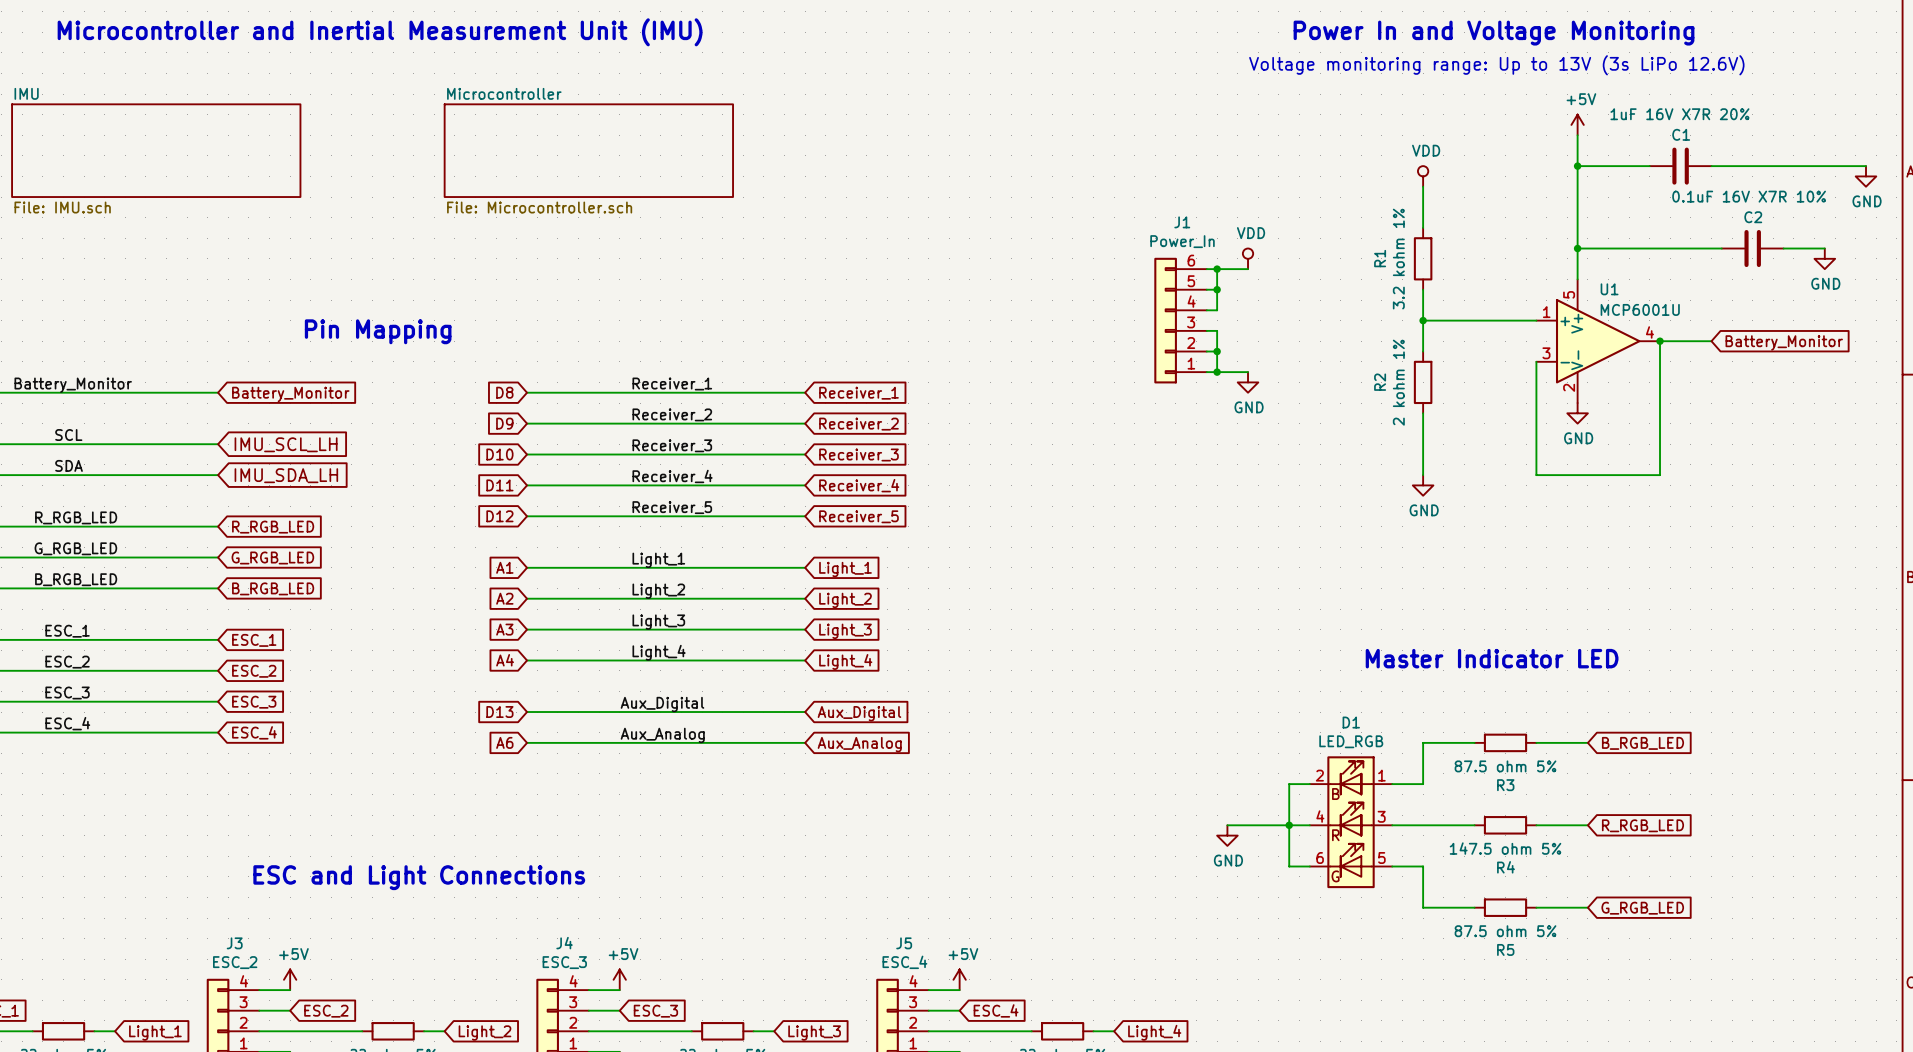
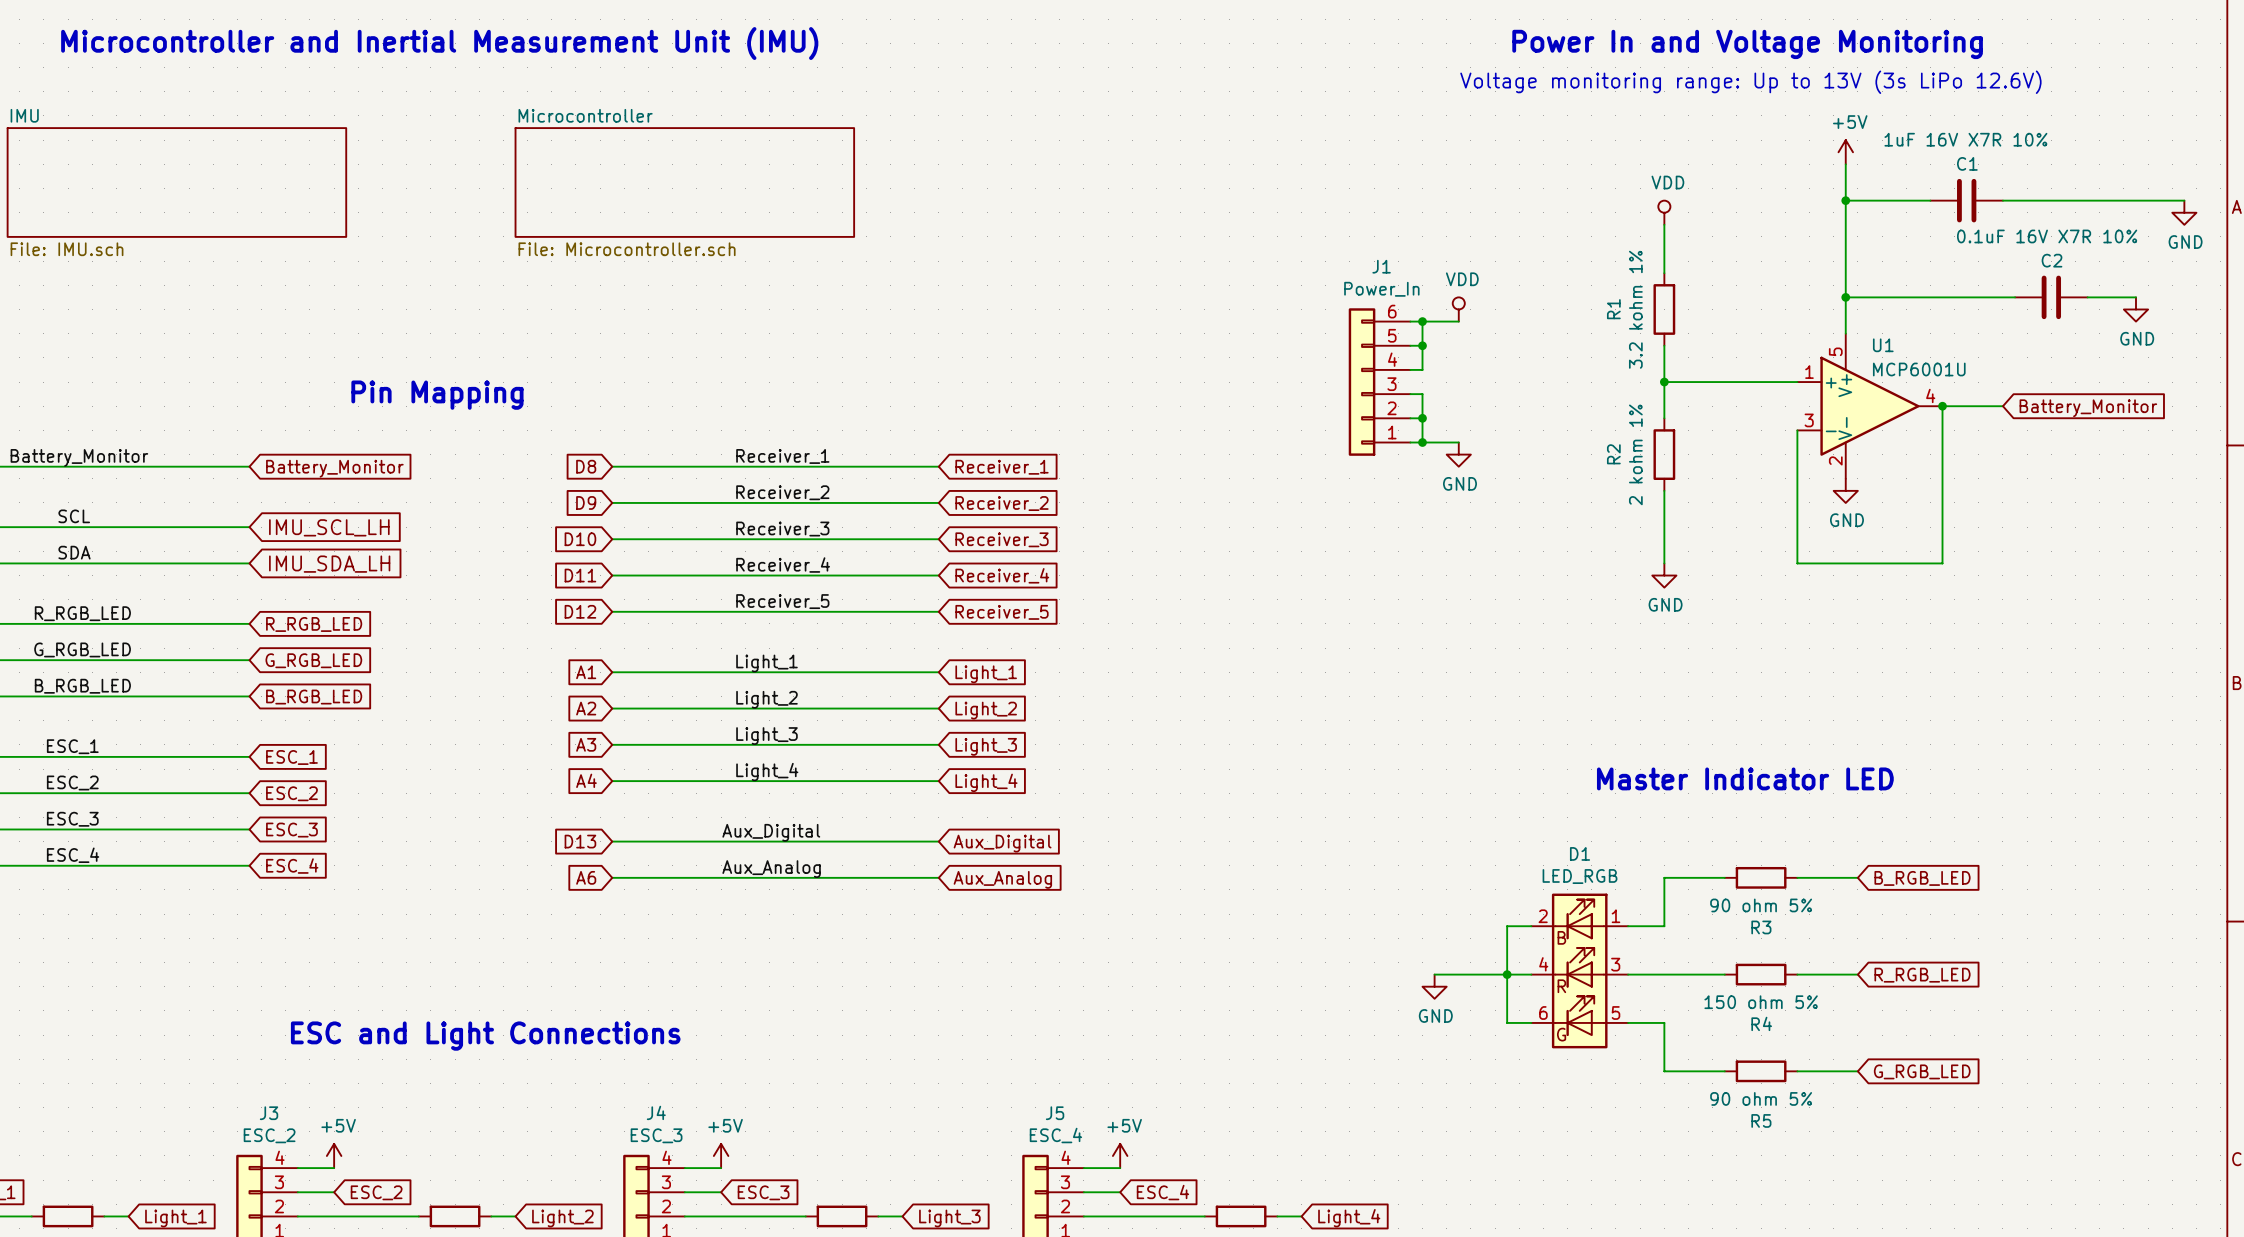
C1 value: 1uF 16V X7R 20% (1679, 114) -> 1uF 16V X7R 10% (1965, 139)
R3 value: 87.5 ohm 5% (1505, 766) -> 90 ohm 5% (1761, 905)
R4 value: 147.5 ohm 5% (1505, 848) -> 150 ohm 5% (1761, 1002)
R5 value: 87.5 ohm 5% (1505, 931) -> 90 ohm 5% (1761, 1098)

